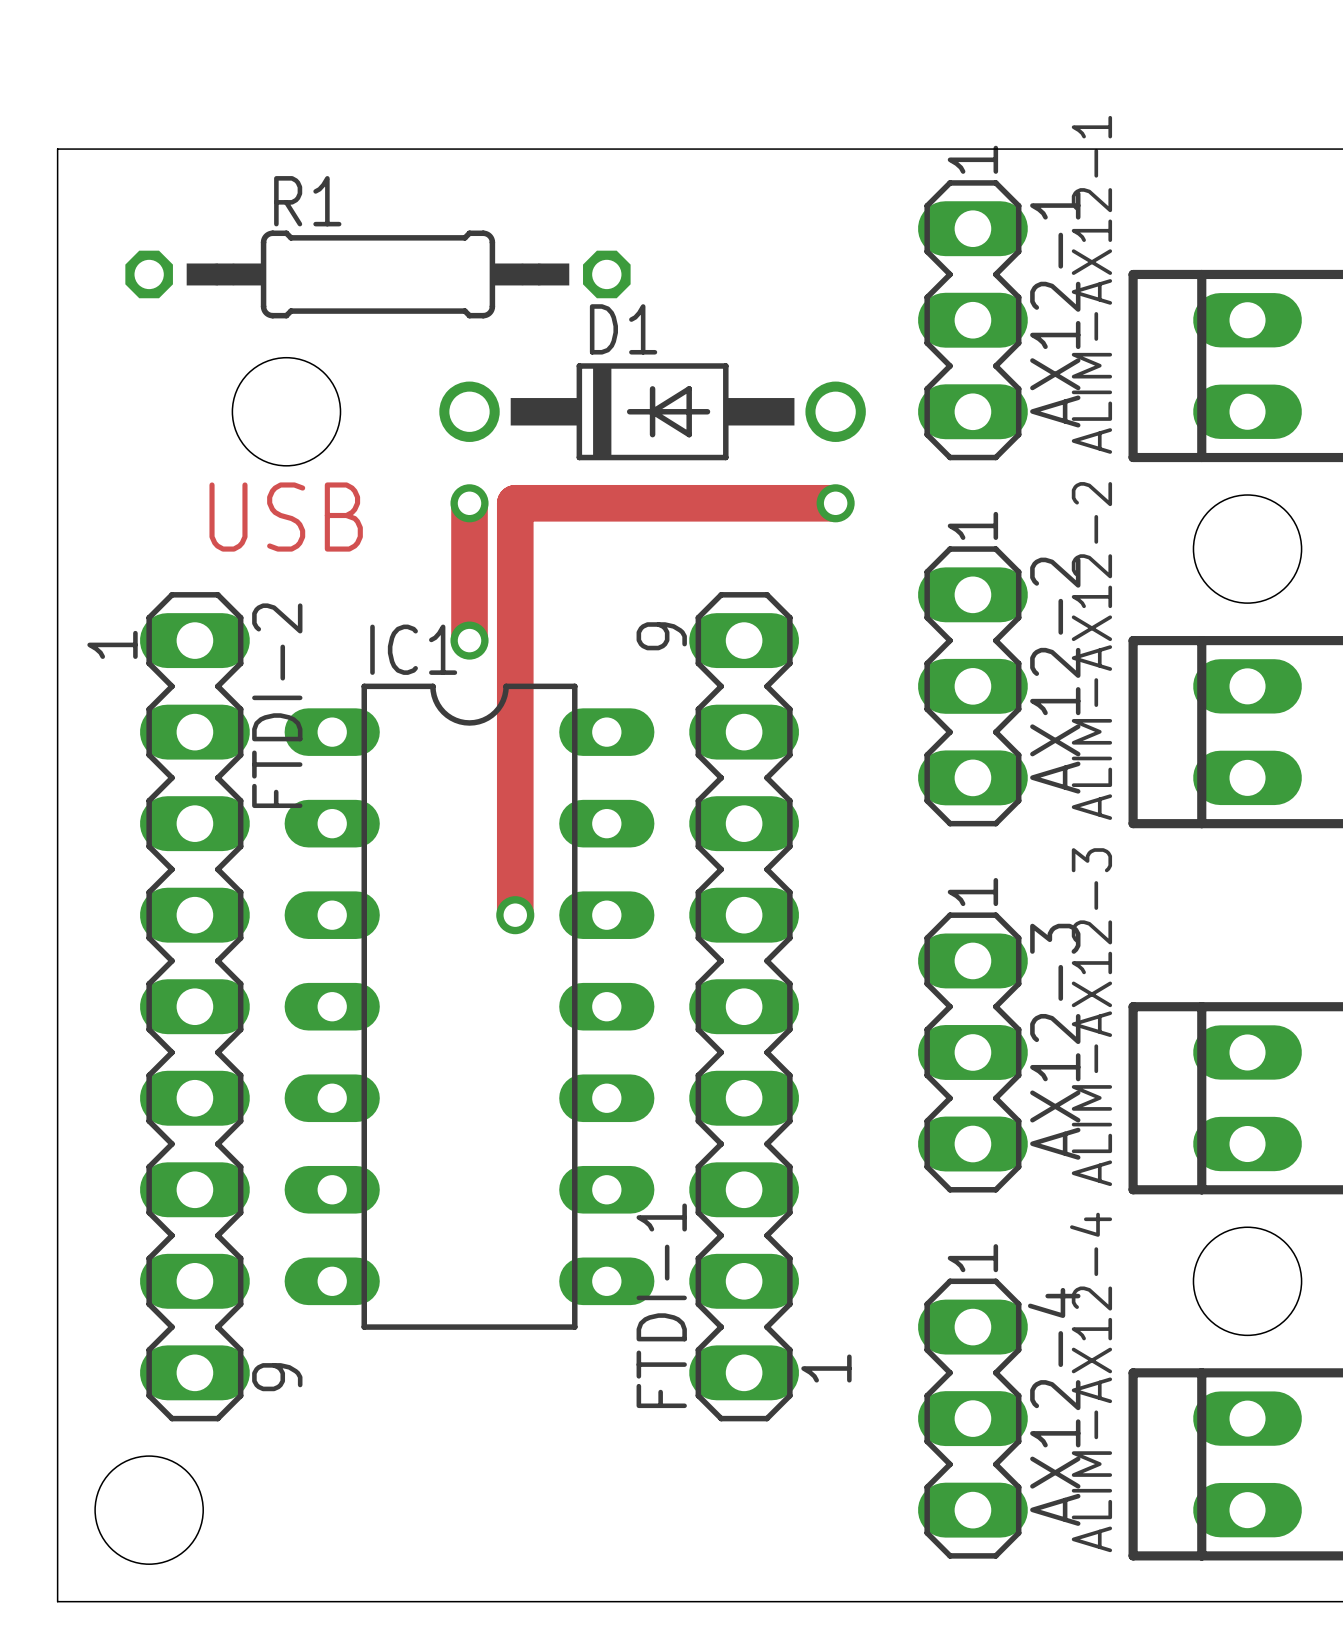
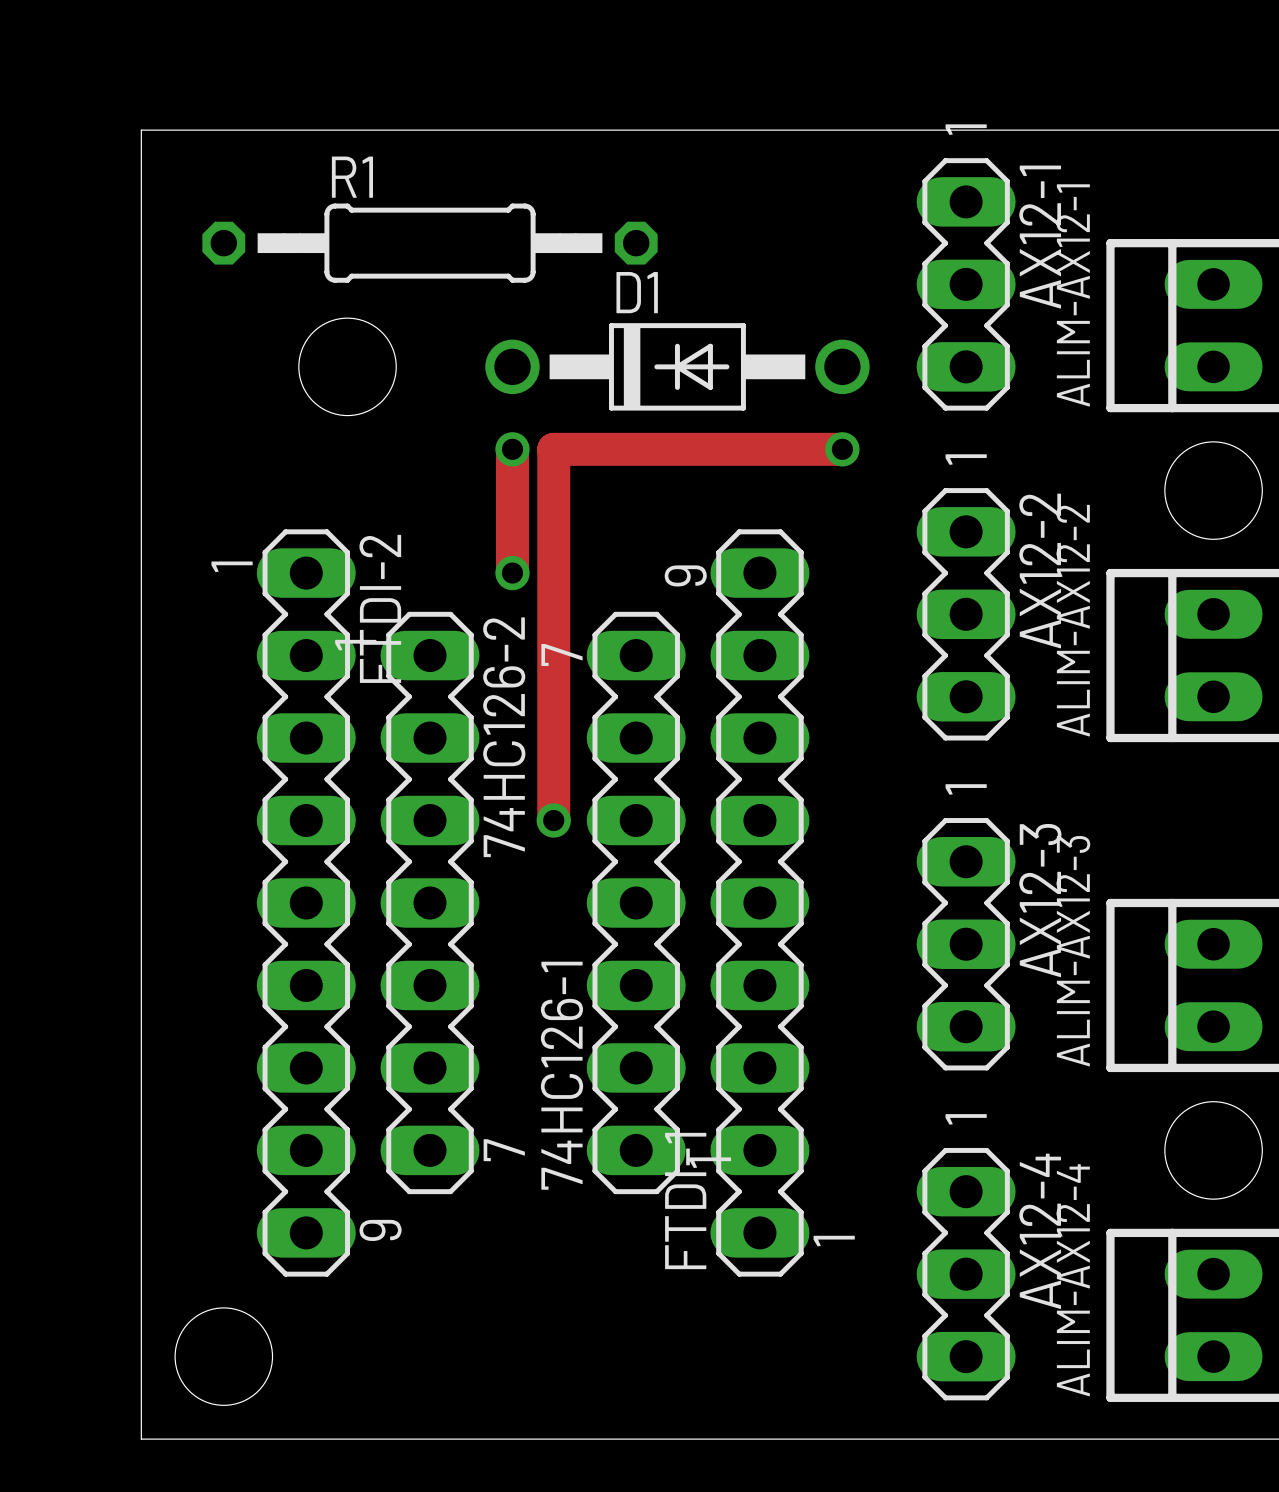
text: USB (286, 517) -> none
FTDI-2 position: (194, 1006) -> (306, 902)
74HC126-2: none -> (430, 902)
IC1: (469, 1006) -> none
74HC126-1: none -> (636, 902)

